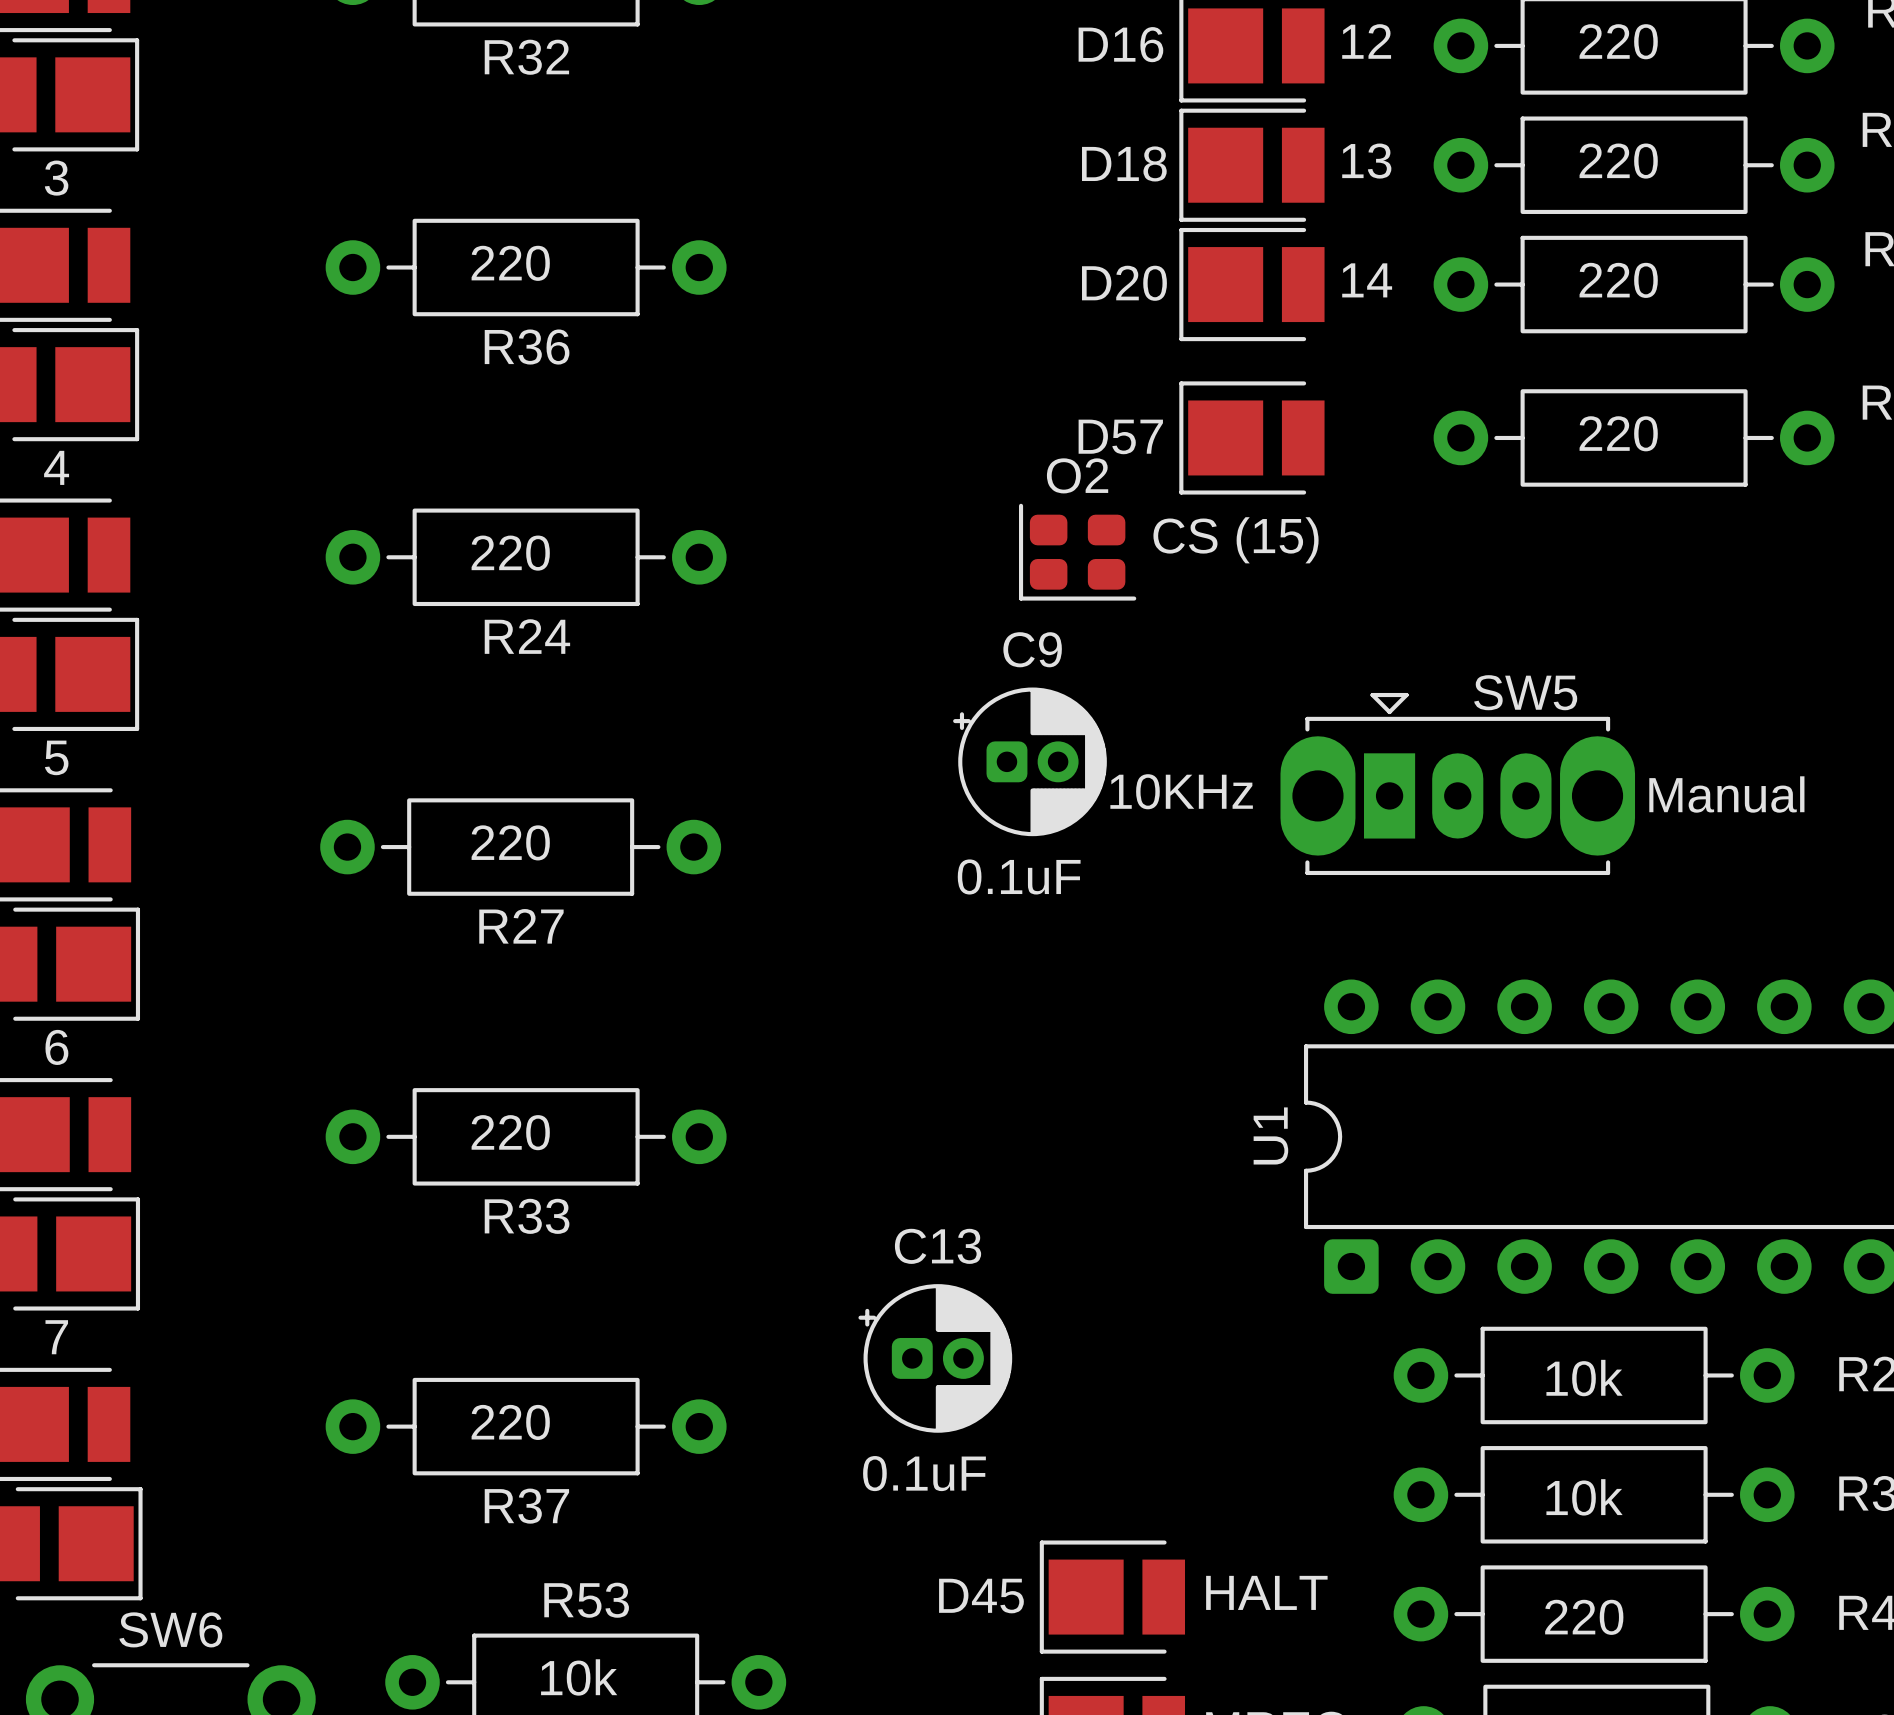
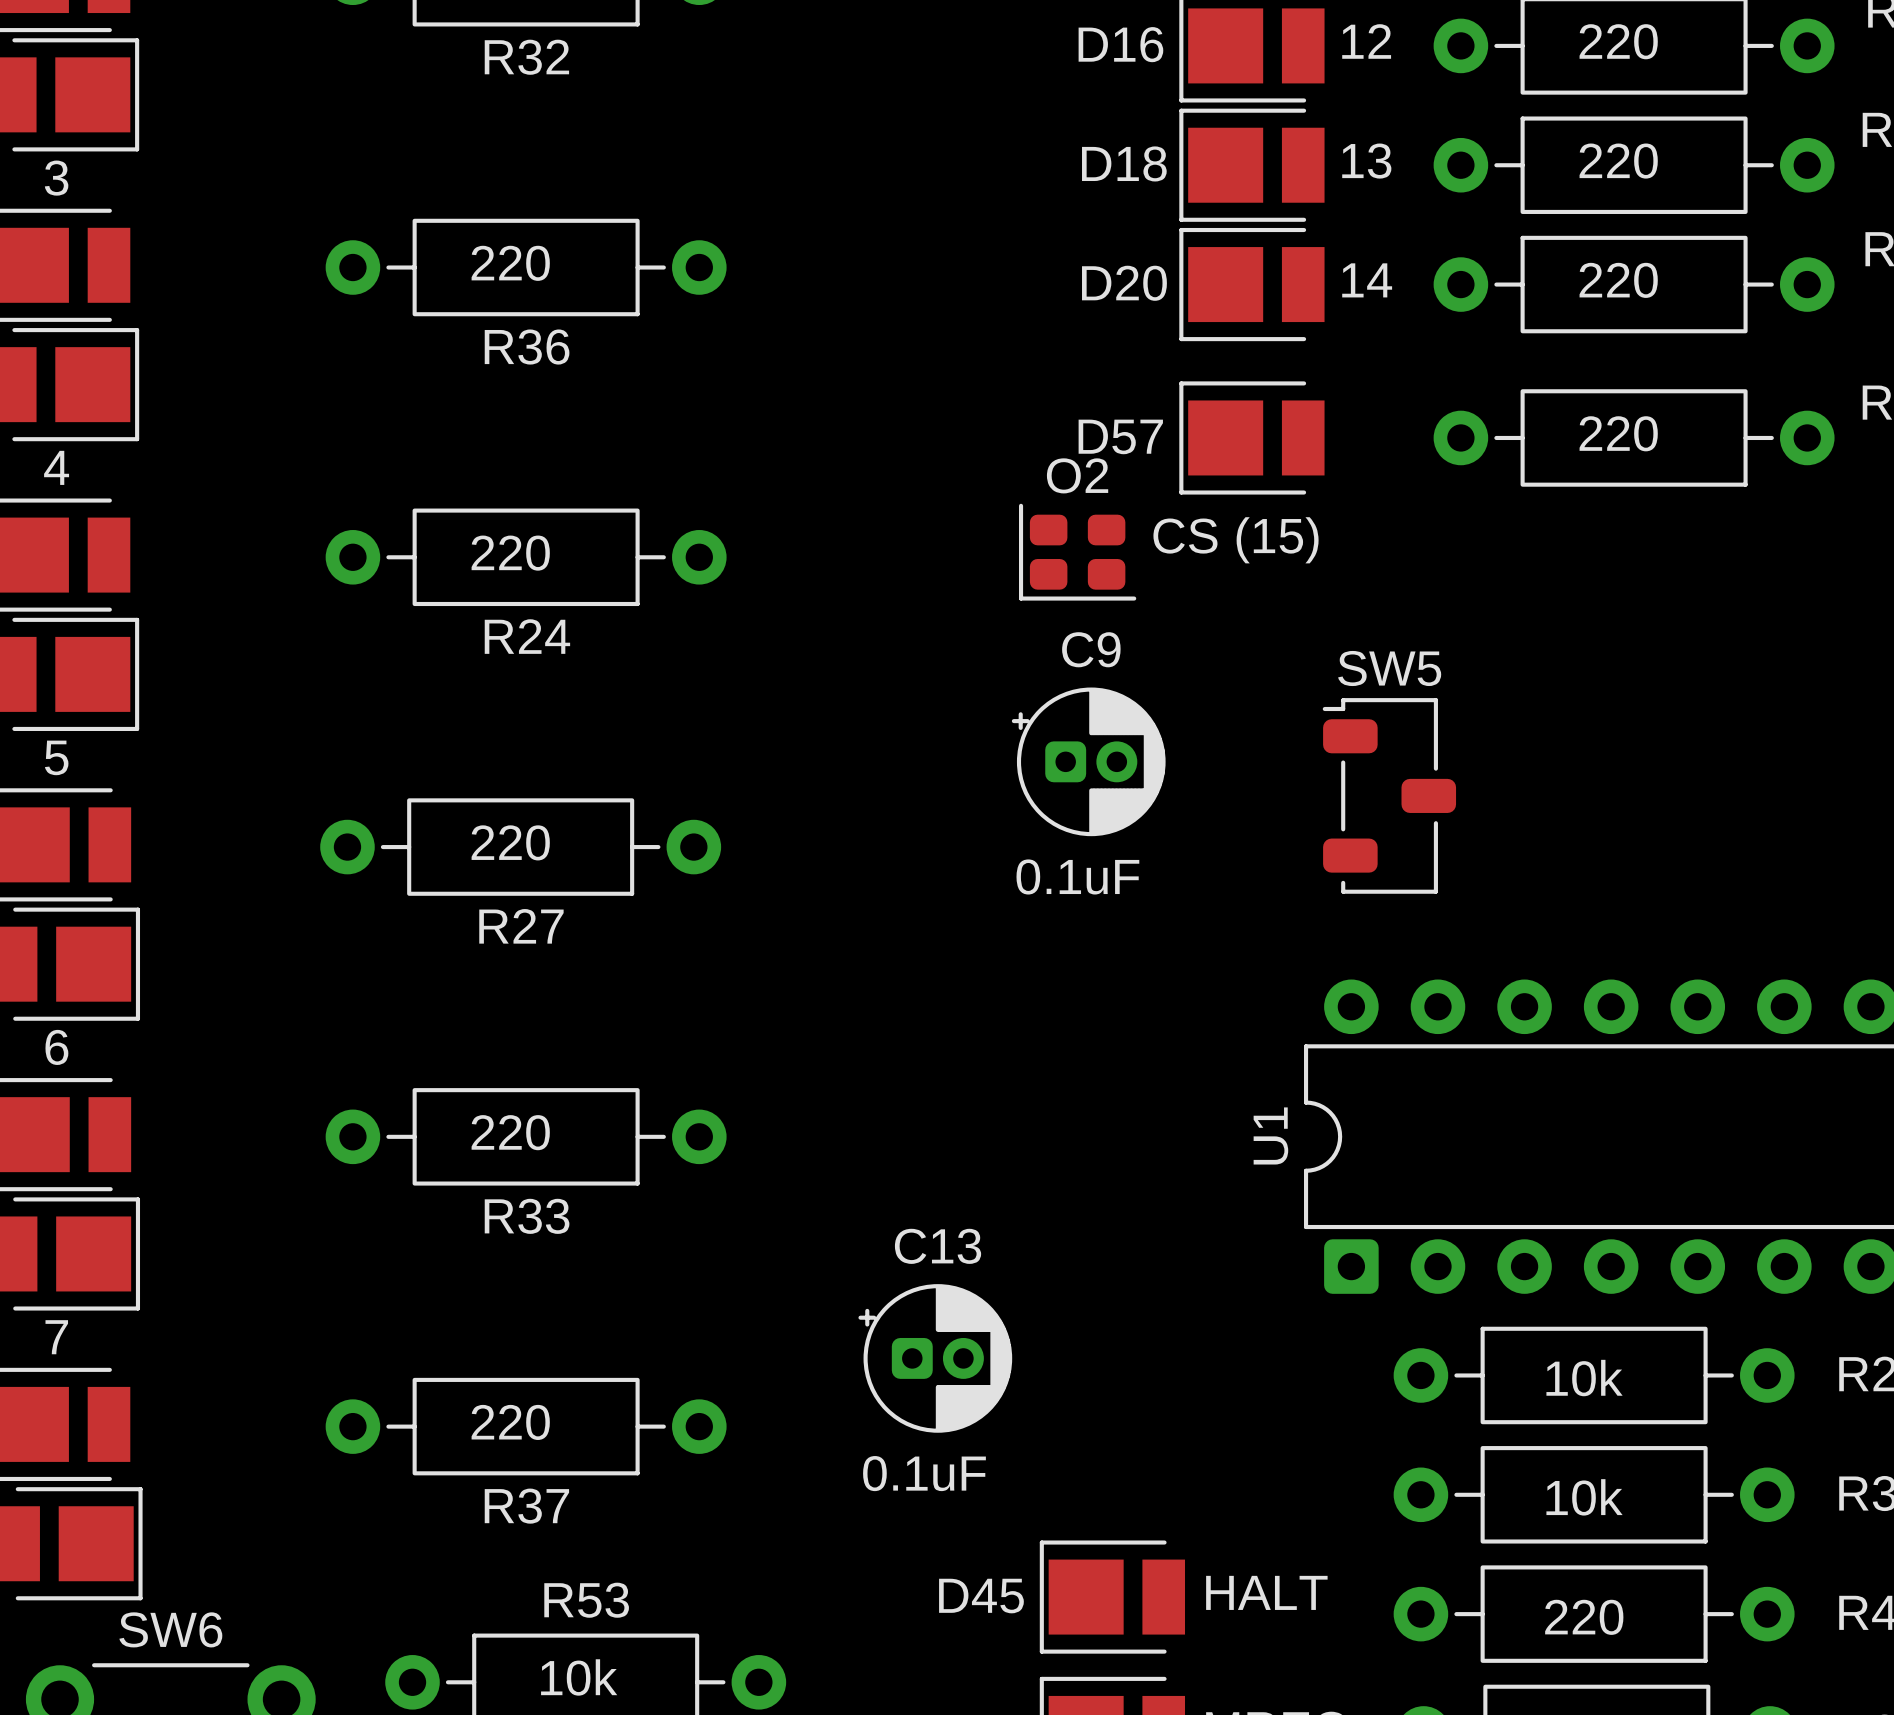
SW5 footprint: [1280, 692, 1636, 876] -> [1322, 698, 1457, 894]
SW5 name position: SW5 (1525, 692) -> SW5 (1389, 668)
C9 position: (1029, 761) -> (1088, 761)
text: 10KHz (1181, 791) -> none
text: Manual (1726, 794) -> none
text position: 0.1uF (1019, 876) -> 0.1uF (1077, 876)

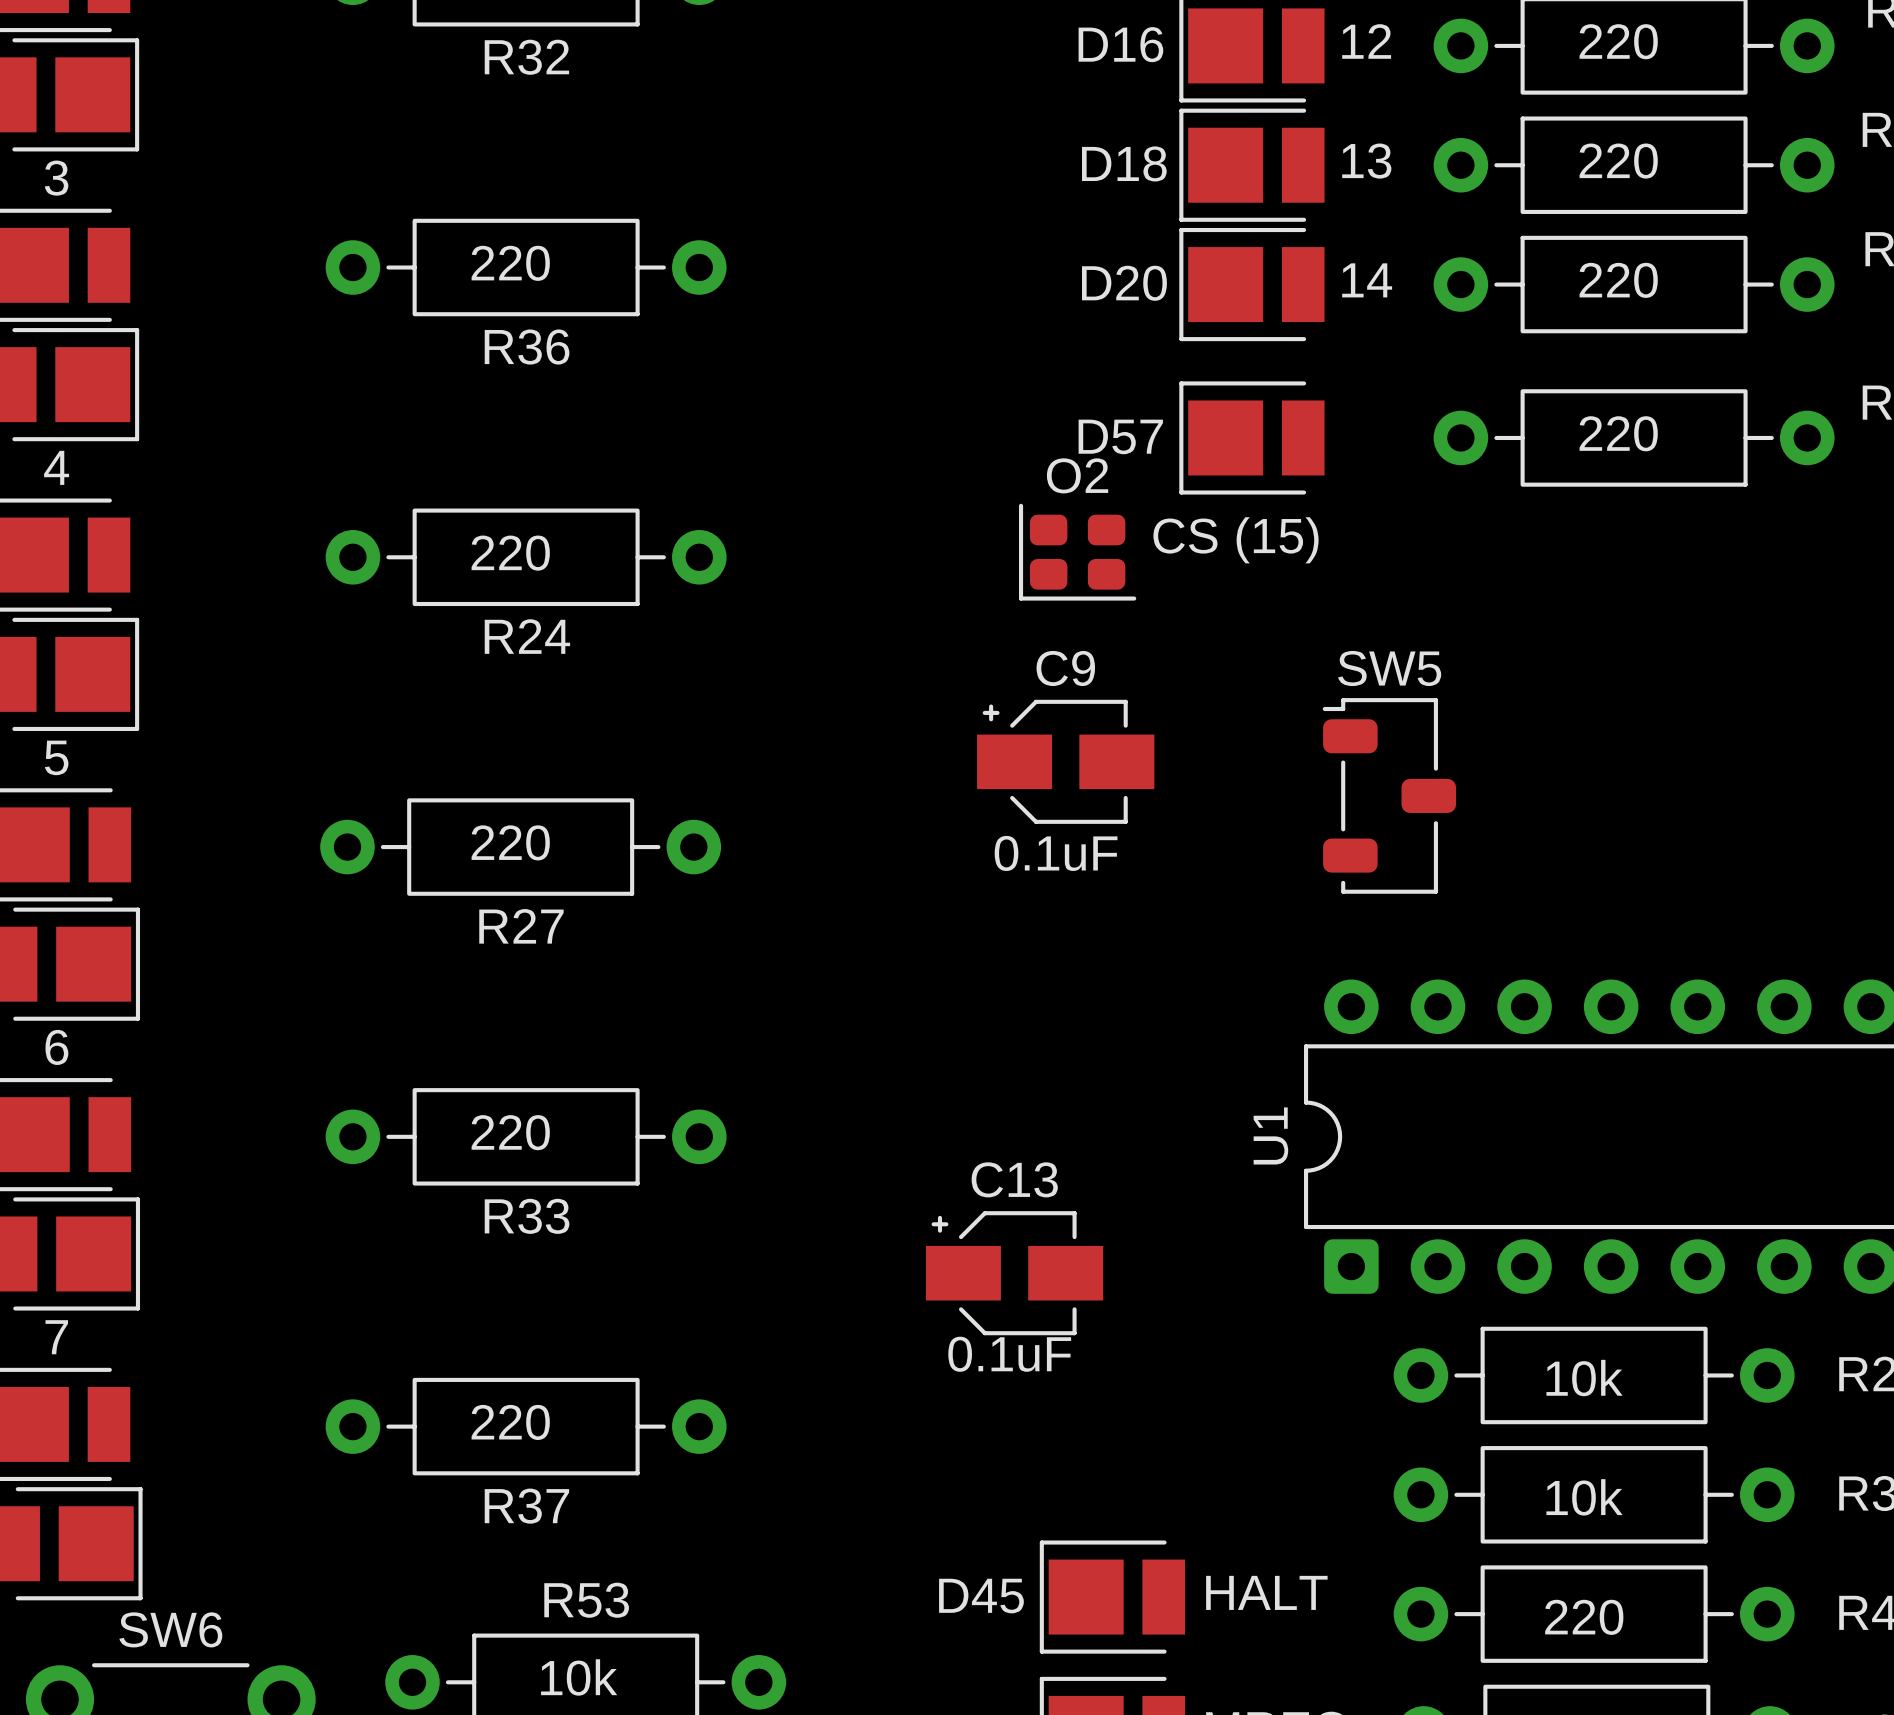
C9 footprint: [1011, 687, 1166, 837] -> [977, 699, 1155, 824]
text position: 0.1uF (1077, 876) -> 0.1uF (1056, 853)
C13 footprint: [858, 1284, 1013, 1433] -> [925, 1211, 1104, 1336]
text position: 0.1uF (924, 1473) -> 0.1uF (1009, 1354)

